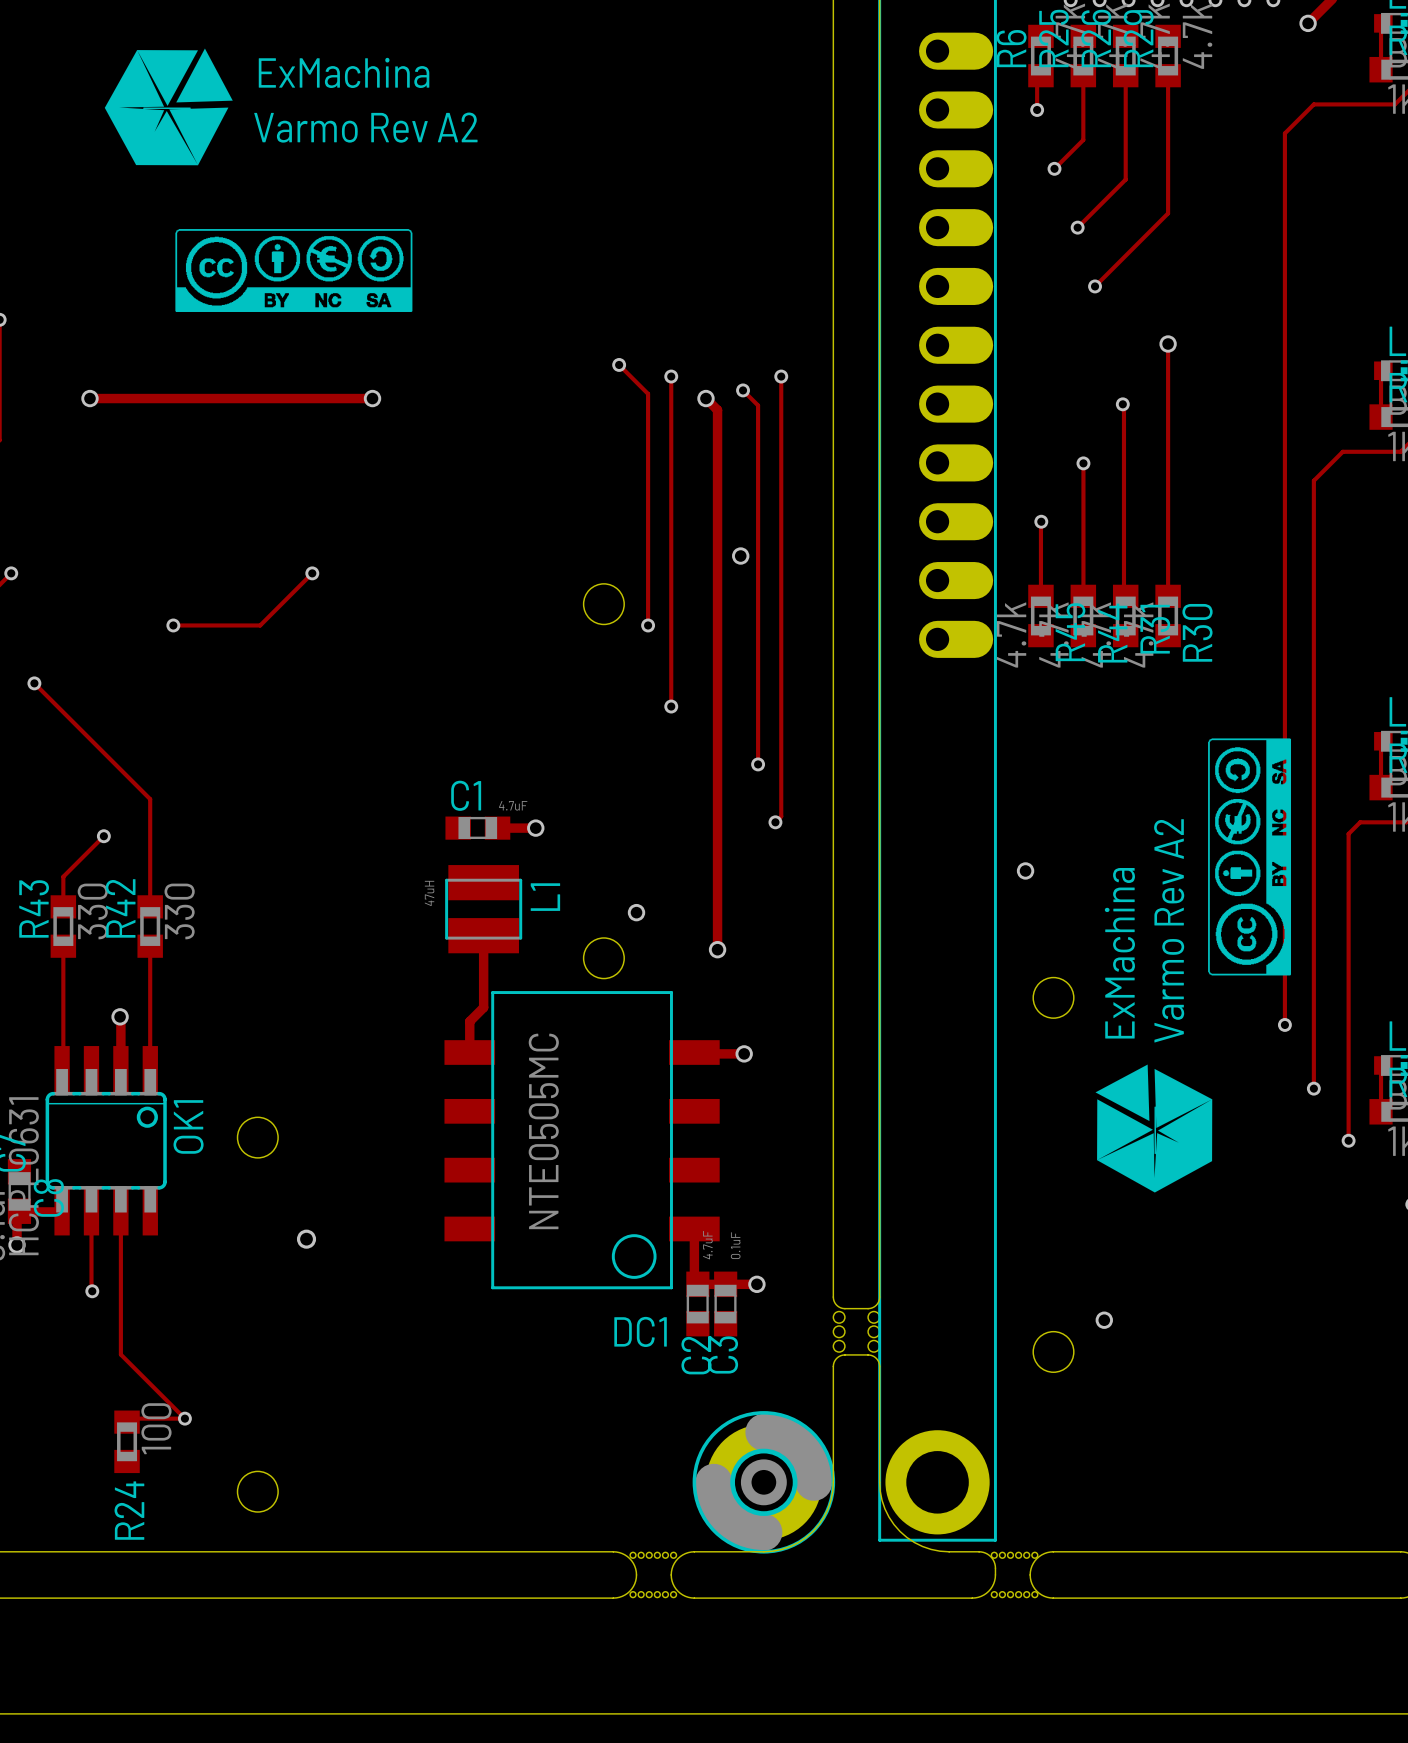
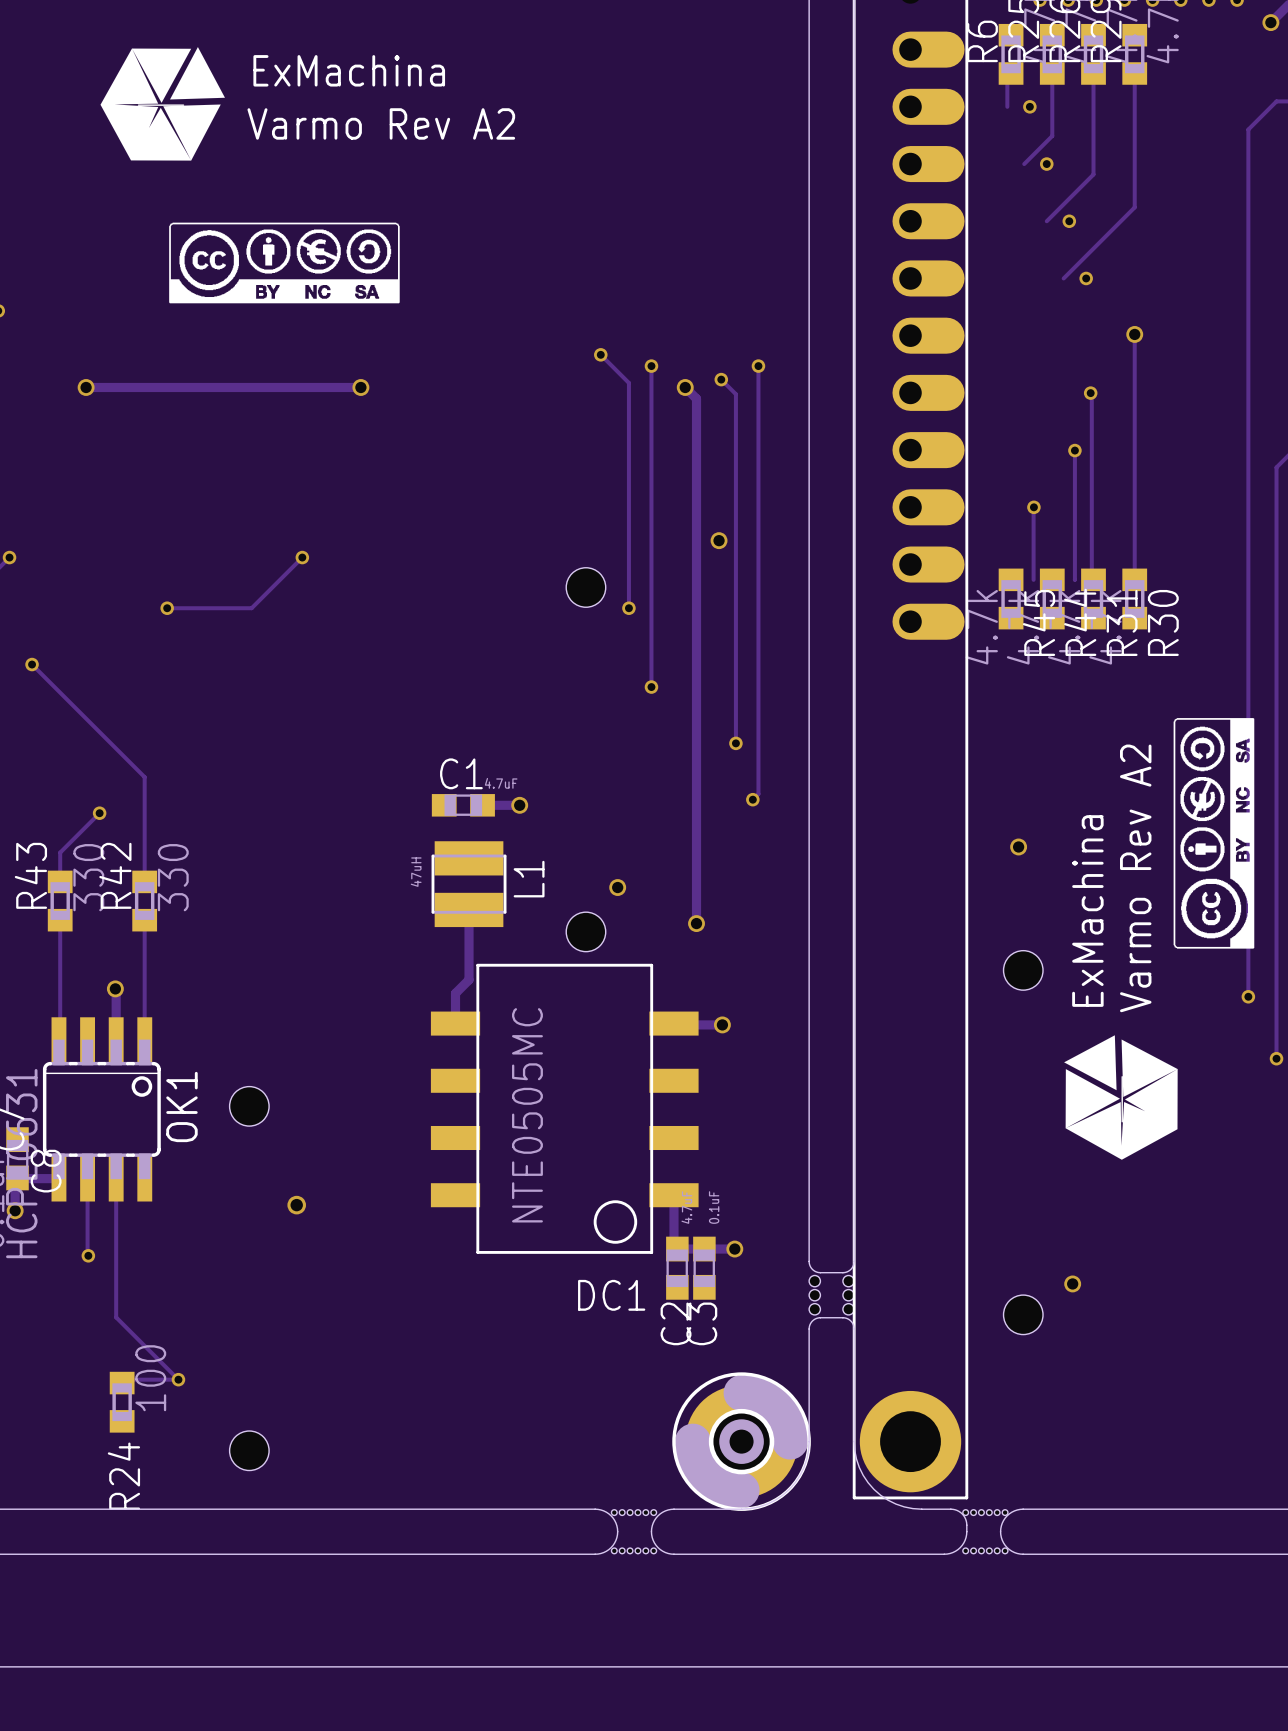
via position: (1037, 109) -> (1029, 106)
via position: (1054, 168) -> (1046, 164)
via position: (1077, 227) -> (1069, 221)
via position: (1095, 286) -> (1086, 278)
track: (1083, 463) (1083, 596) -> (1074, 450) (1074, 579)
via position: (1083, 463) -> (1074, 450)
track: (1041, 521) (1040, 596) -> (1033, 507) (1033, 579)
via position: (1041, 521) -> (1033, 507)
via position: (1025, 870) -> (1018, 846)

